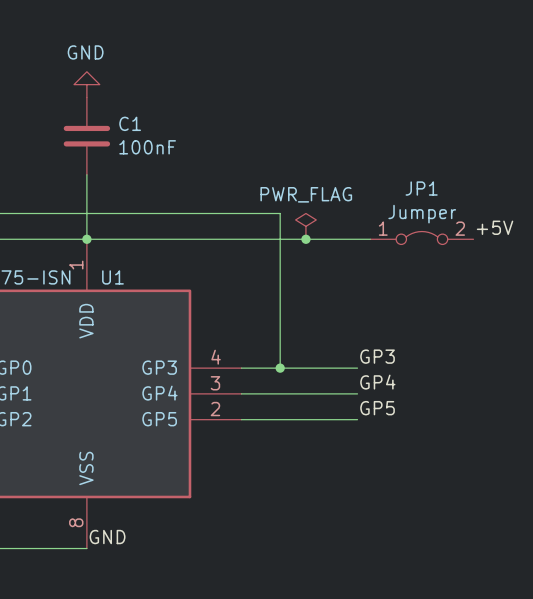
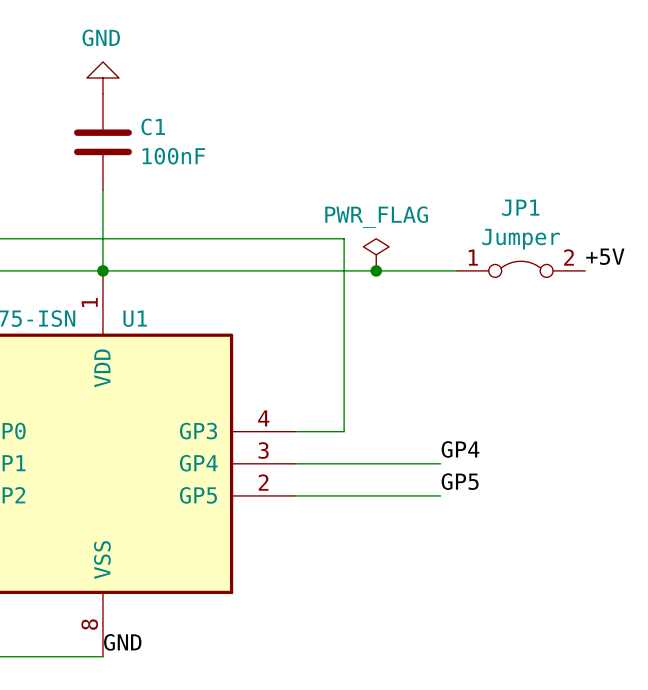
label: GP3 (377, 356) -> none
wire: (280, 368) (357, 368) -> none
junction: (280, 368) -> none

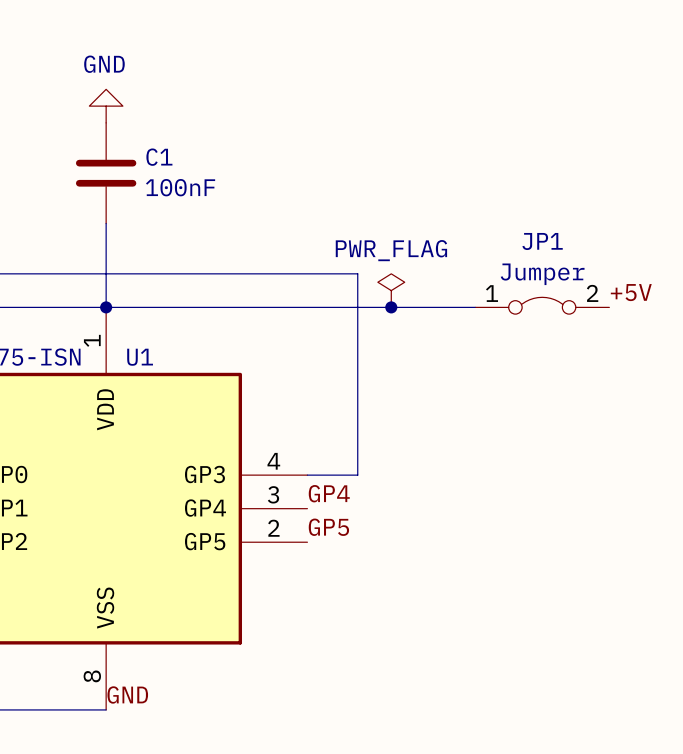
label position: GP4 (460, 449) -> GP4 (329, 493)
wire: (295, 463) (440, 463) -> none
label position: GP5 (460, 481) -> GP5 (328, 527)
wire: (295, 495) (440, 495) -> none

